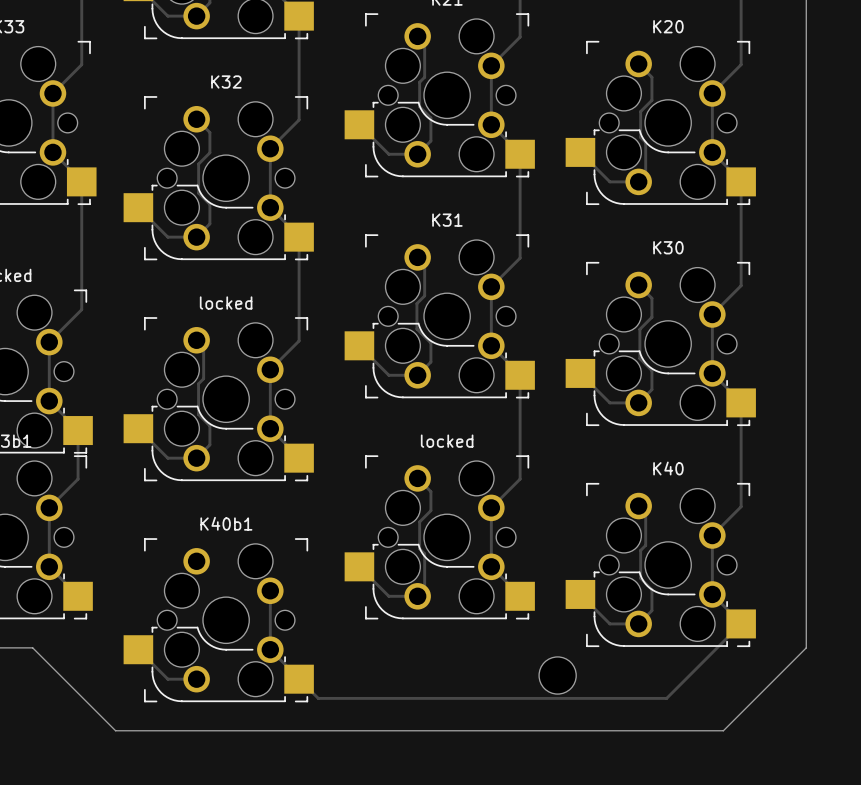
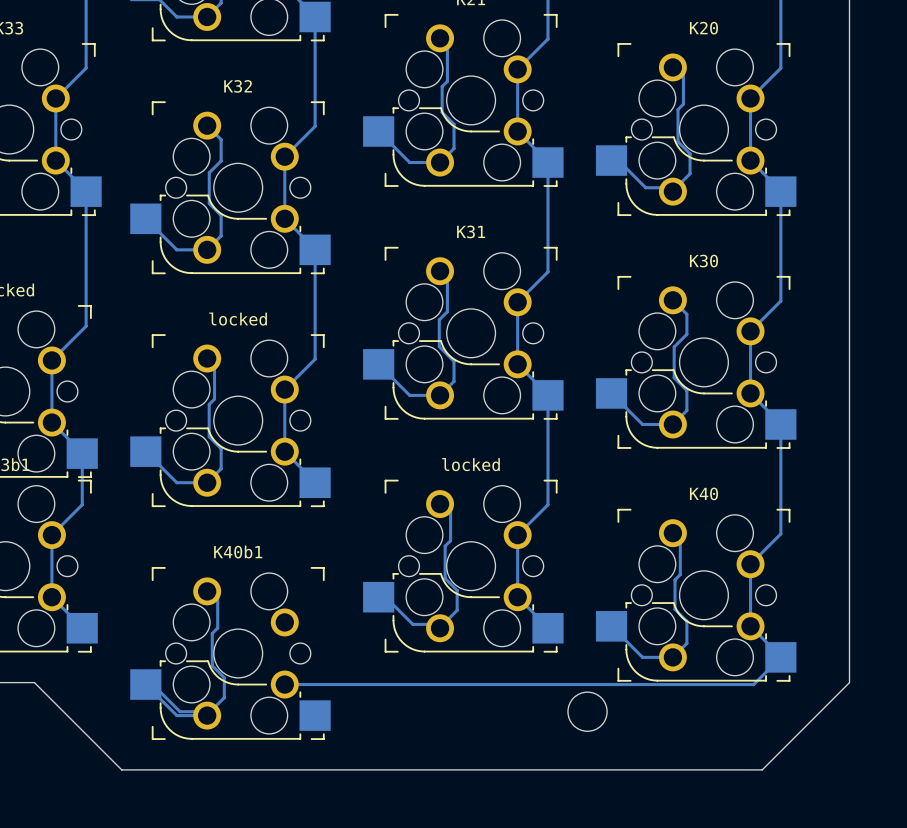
track: none -> (676, 63) (683, 70) (683, 104) (678, 109) (678, 141) (690, 153) (690, 173) (676, 187) (645, 187) (614, 156)
track: (638, 64) (651, 77) (651, 100) (640, 111) (640, 137) (645, 142) (645, 174) (638, 181) (609, 181) (580, 152) -> none
track: none -> (443, 500) (450, 507) (450, 540) (445, 546) (445, 578) (457, 590) (457, 610) (443, 624) (412, 624) (381, 593)
track: (417, 478) (430, 491) (430, 510) (419, 521) (419, 548) (424, 553) (424, 589) (417, 596) (388, 596) (359, 566) -> none
track: none -> (210, 587) (217, 594) (217, 628) (212, 633) (212, 665) (224, 677) (224, 697) (210, 711) (180, 711) (148, 680)
track: (270, 590) (270, 649) (318, 698) (666, 698) (715, 649) -> (284, 684) (753, 684)

